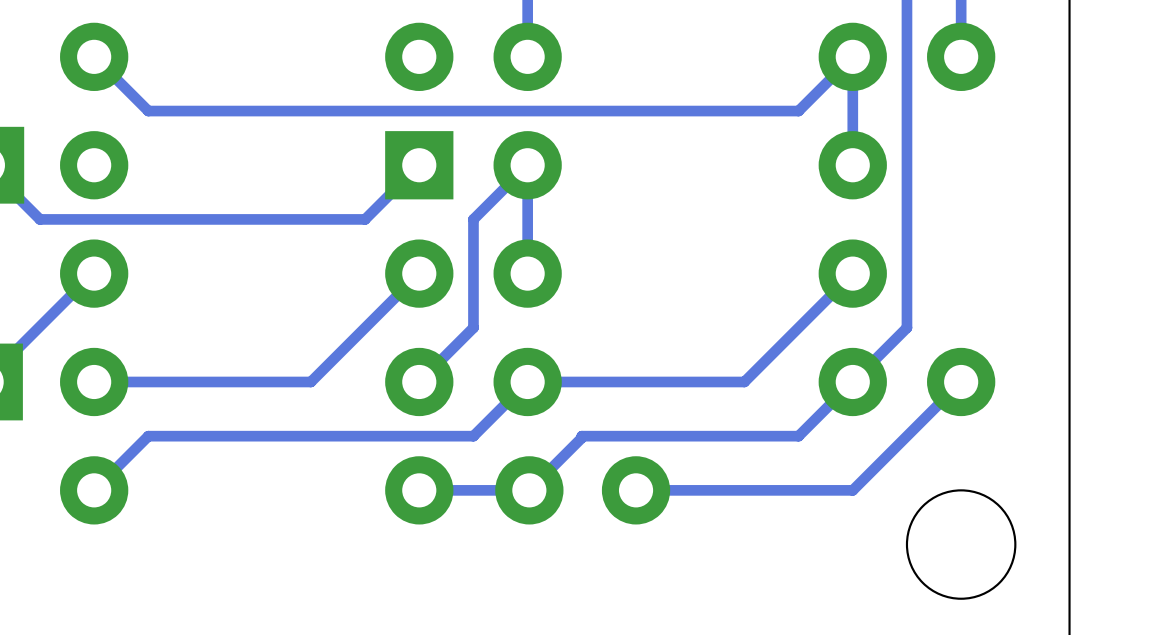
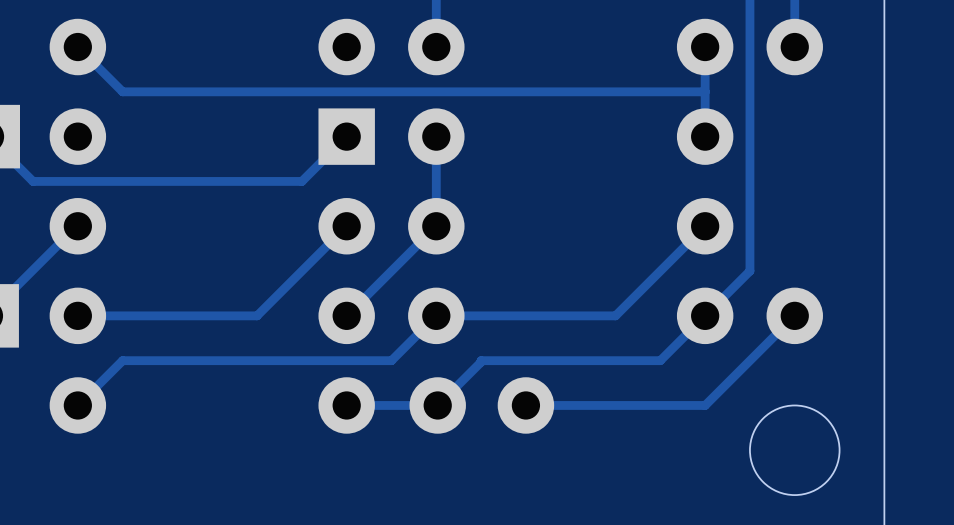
track: (852, 56) (798, 111) -> (705, 91) (660, 91)
track: (527, 165) (473, 219) (473, 327) -> (436, 226) (391, 271)

